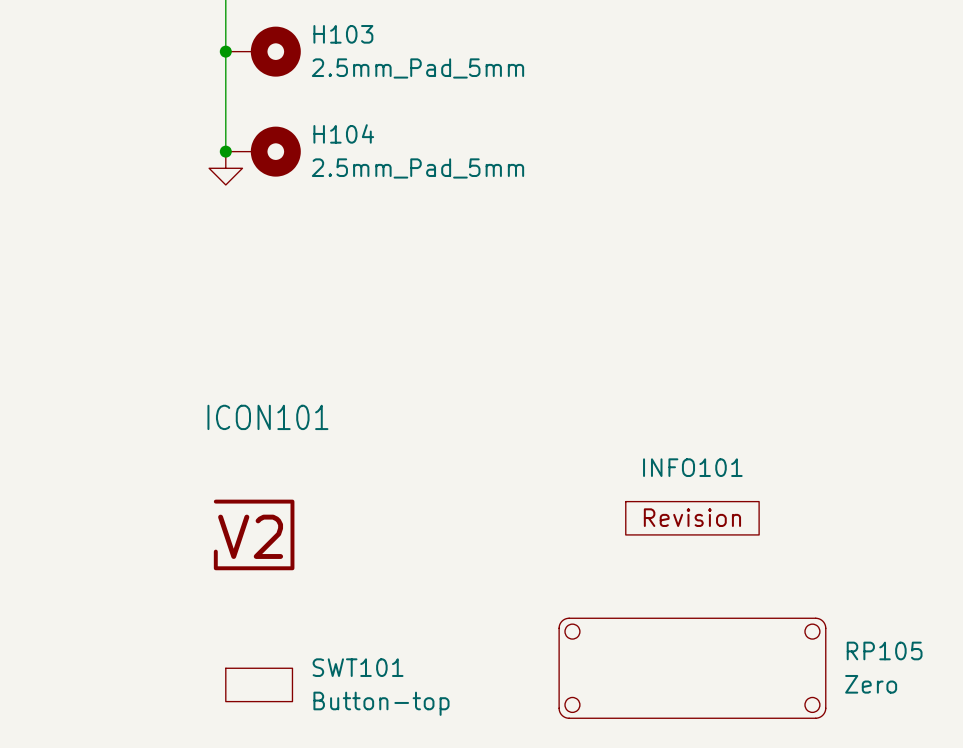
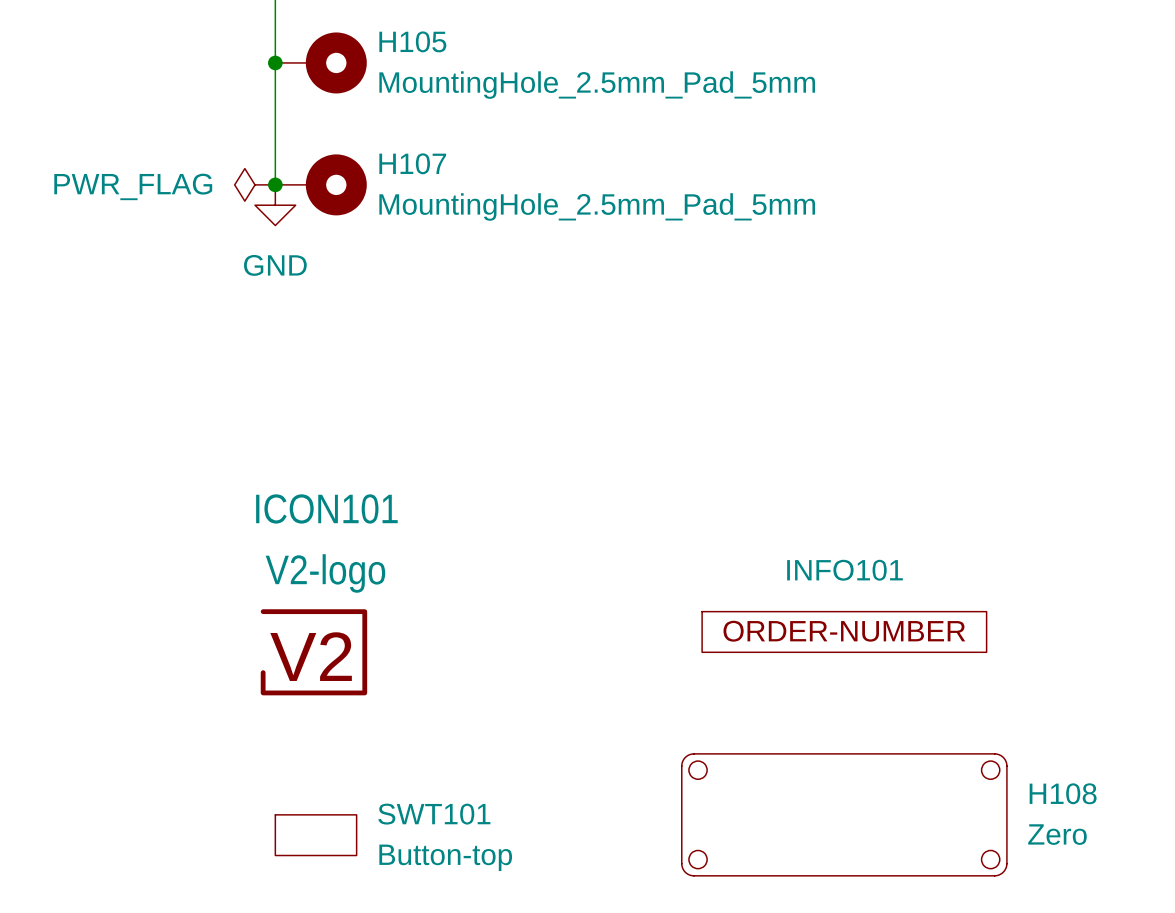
H103 name: H103 (343, 34) -> H105 (412, 41)
H103 value: 2.5mm_Pad_5mm (417, 68) -> MountingHole_2.5mm_Pad_5mm (597, 85)
H104 name: H104 (343, 133) -> H107 (412, 163)
power symbol: none -> PWR_FLAG (255, 184)
H104 value: 2.5mm_Pad_5mm (417, 168) -> MountingHole_2.5mm_Pad_5mm (597, 206)
power symbol text: none -> GND (275, 265)
ICON101 value: none -> V2-logo (325, 573)
ICON101 symbol: [213, 499, 295, 571] -> [260, 609, 368, 696]
INFO101 symbol: [625, 501, 760, 535] -> [702, 611, 987, 653]
RP105 name: RP105 (884, 650) -> H108 (1063, 793)

